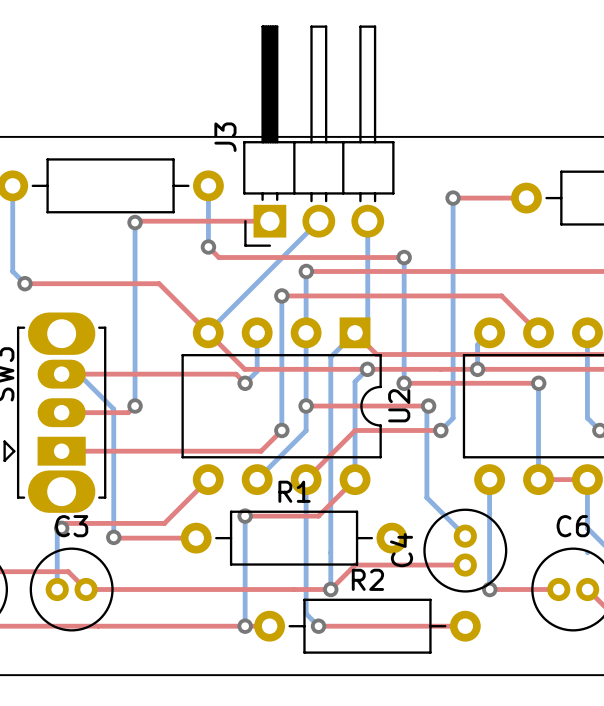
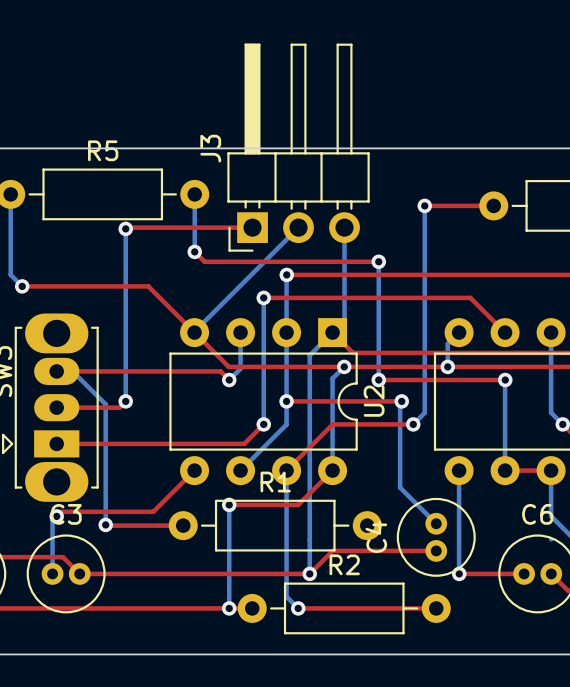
R5 name: none -> R5 (103, 150)

